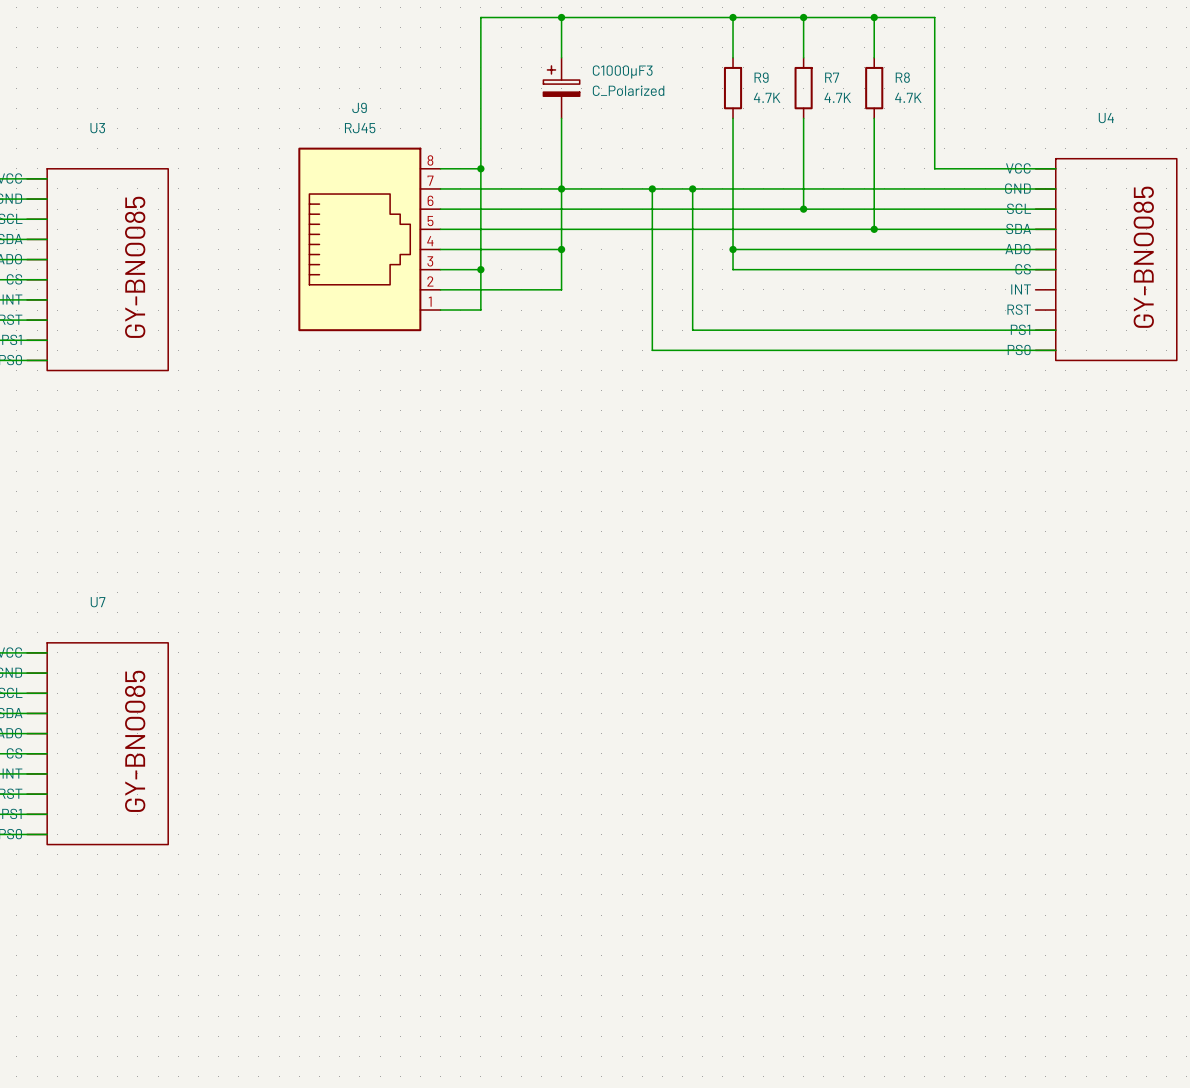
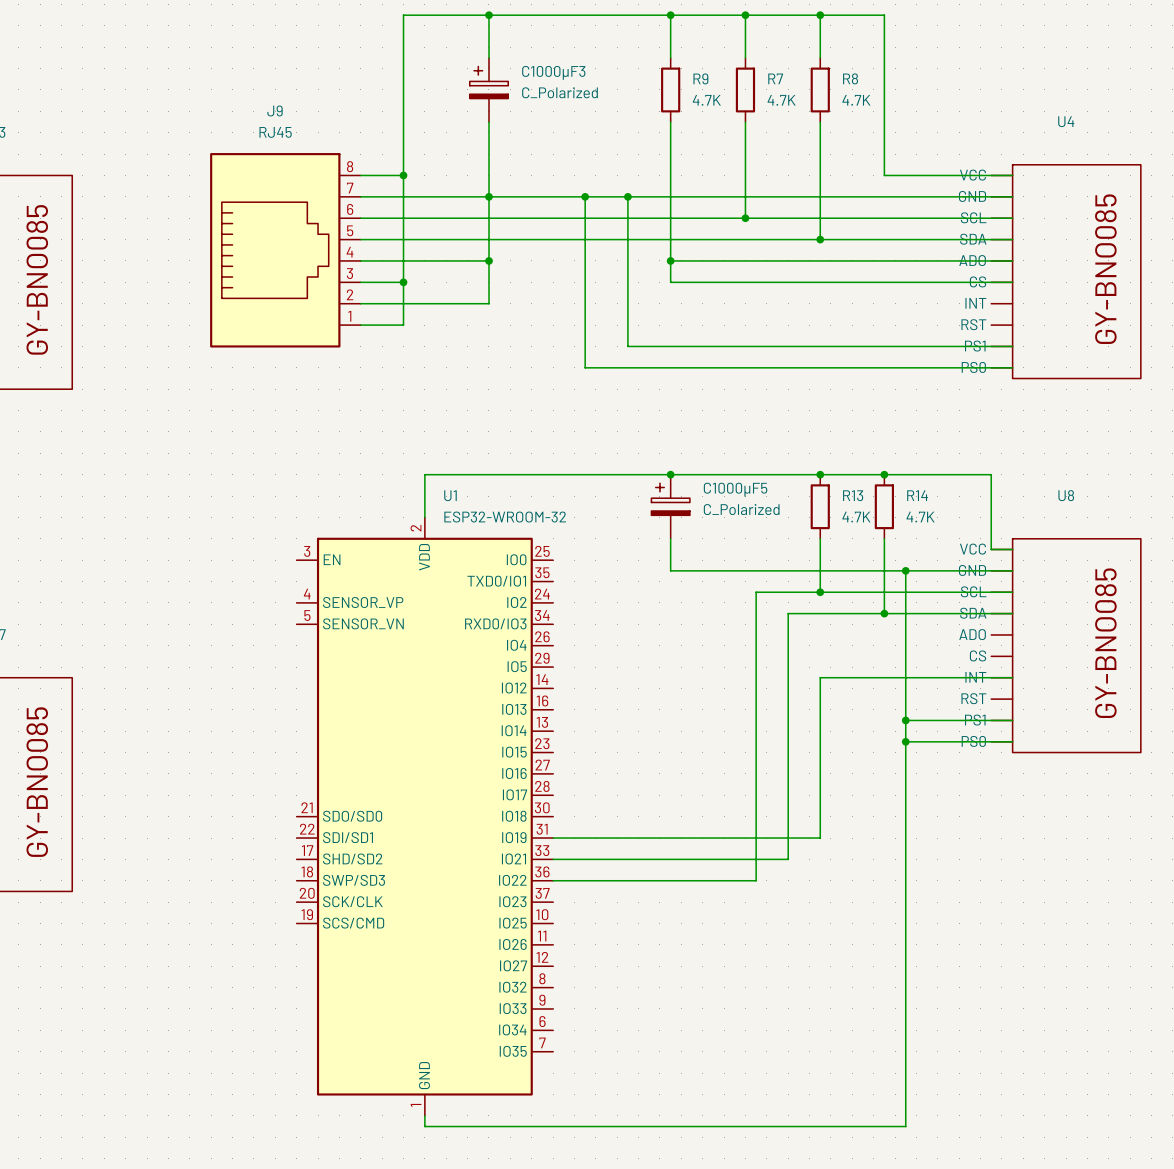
junction: none -> (670, 474)
junction: none -> (820, 474)
junction: none -> (884, 474)
C1000µF5: none -> C_Polarized (670, 506)
R13: none -> 4.7K (820, 506)
R14: none -> 4.7K (884, 506)
wire: none -> (424, 517) (424, 474) (991, 474) (991, 549) (1012, 549)
wire: none -> (670, 538) (670, 570) (1012, 570)
wire: none -> (820, 538) (820, 592)
wire: none -> (884, 538) (884, 613)
wire: none -> (905, 570) (905, 1126) (424, 1126) (424, 1115)
junction: none -> (905, 570)
junction: none -> (820, 592)
wire: none -> (1012, 592) (756, 592) (756, 880) (553, 880)
junction: none -> (884, 613)
wire: none -> (1012, 613) (788, 613) (788, 859) (553, 859)
U8: none -> (1066, 645)
wire: none -> (1012, 677) (820, 677) (820, 838) (553, 838)
wire: none -> (905, 720) (1012, 720)
junction: none -> (905, 720)
wire: none -> (905, 741) (1012, 741)
junction: none -> (905, 741)
U1: none -> ESP32-WROOM-32 (424, 816)

